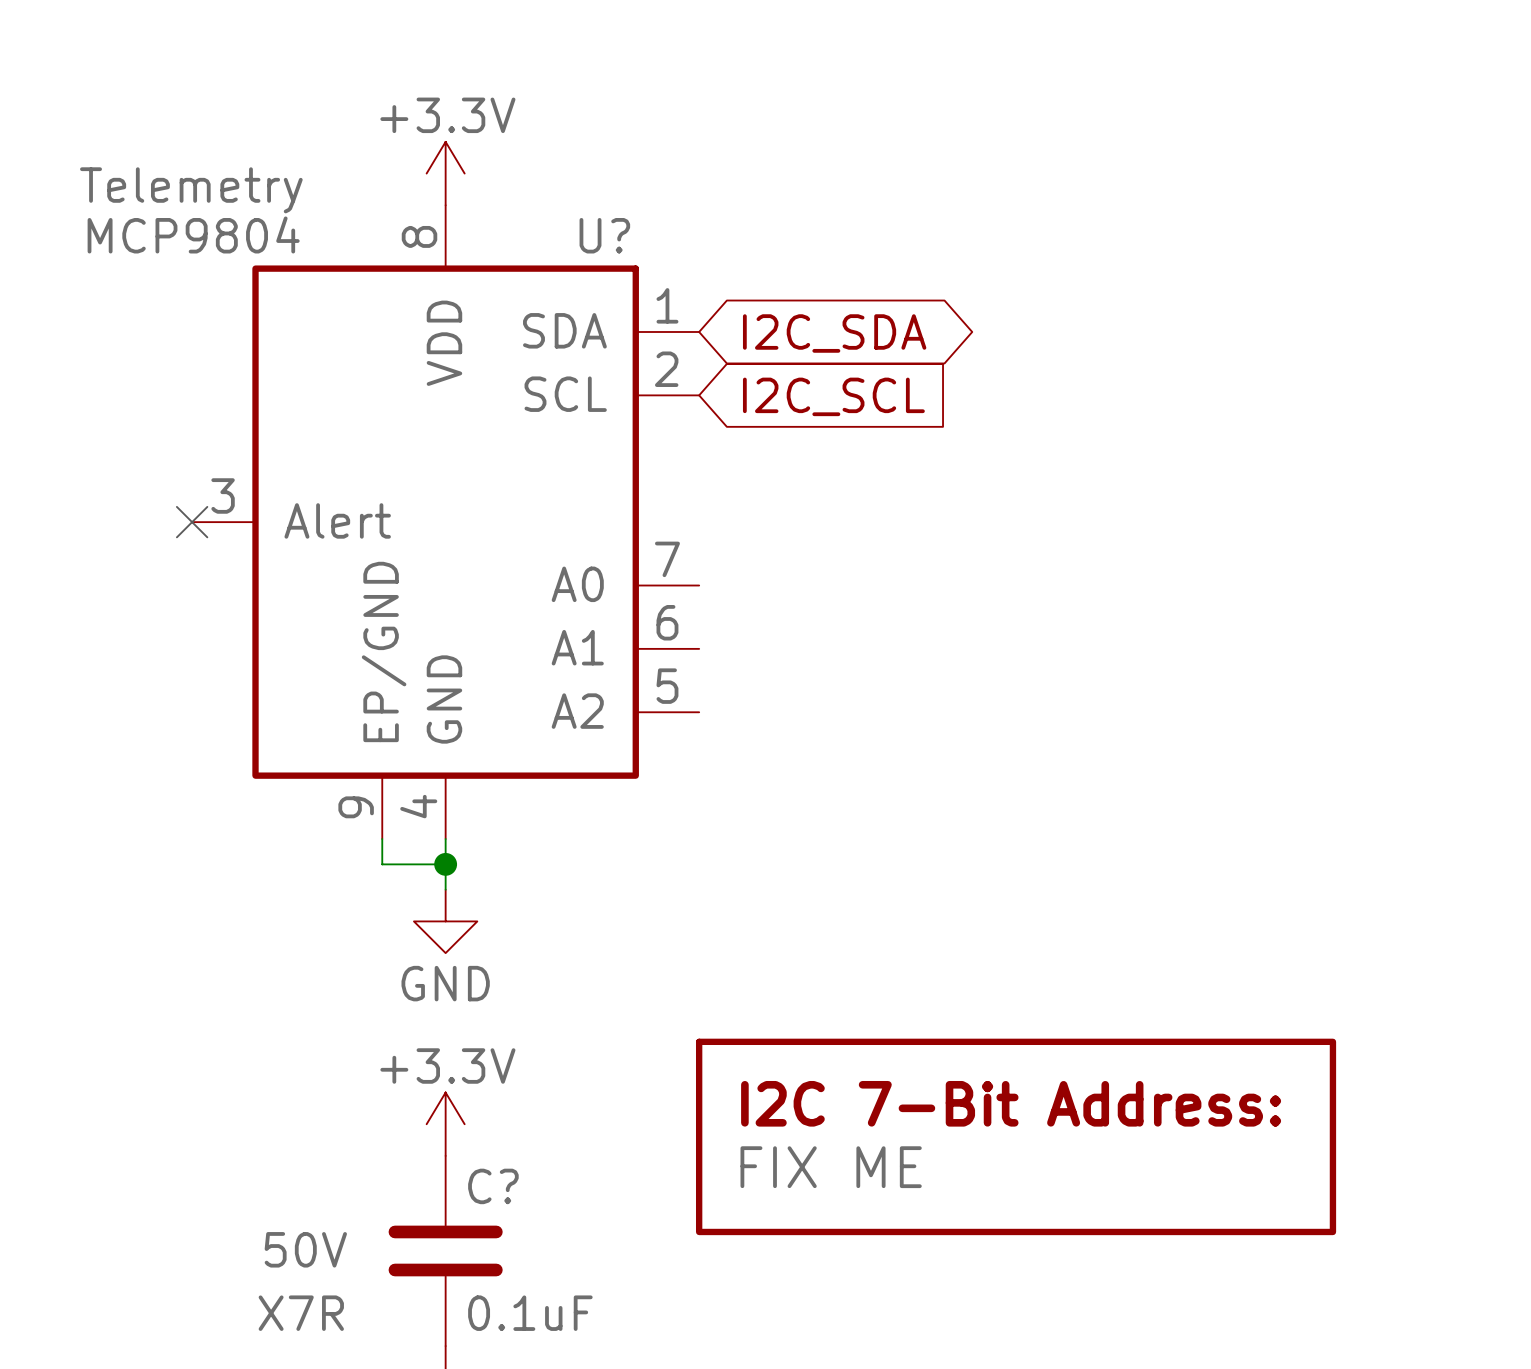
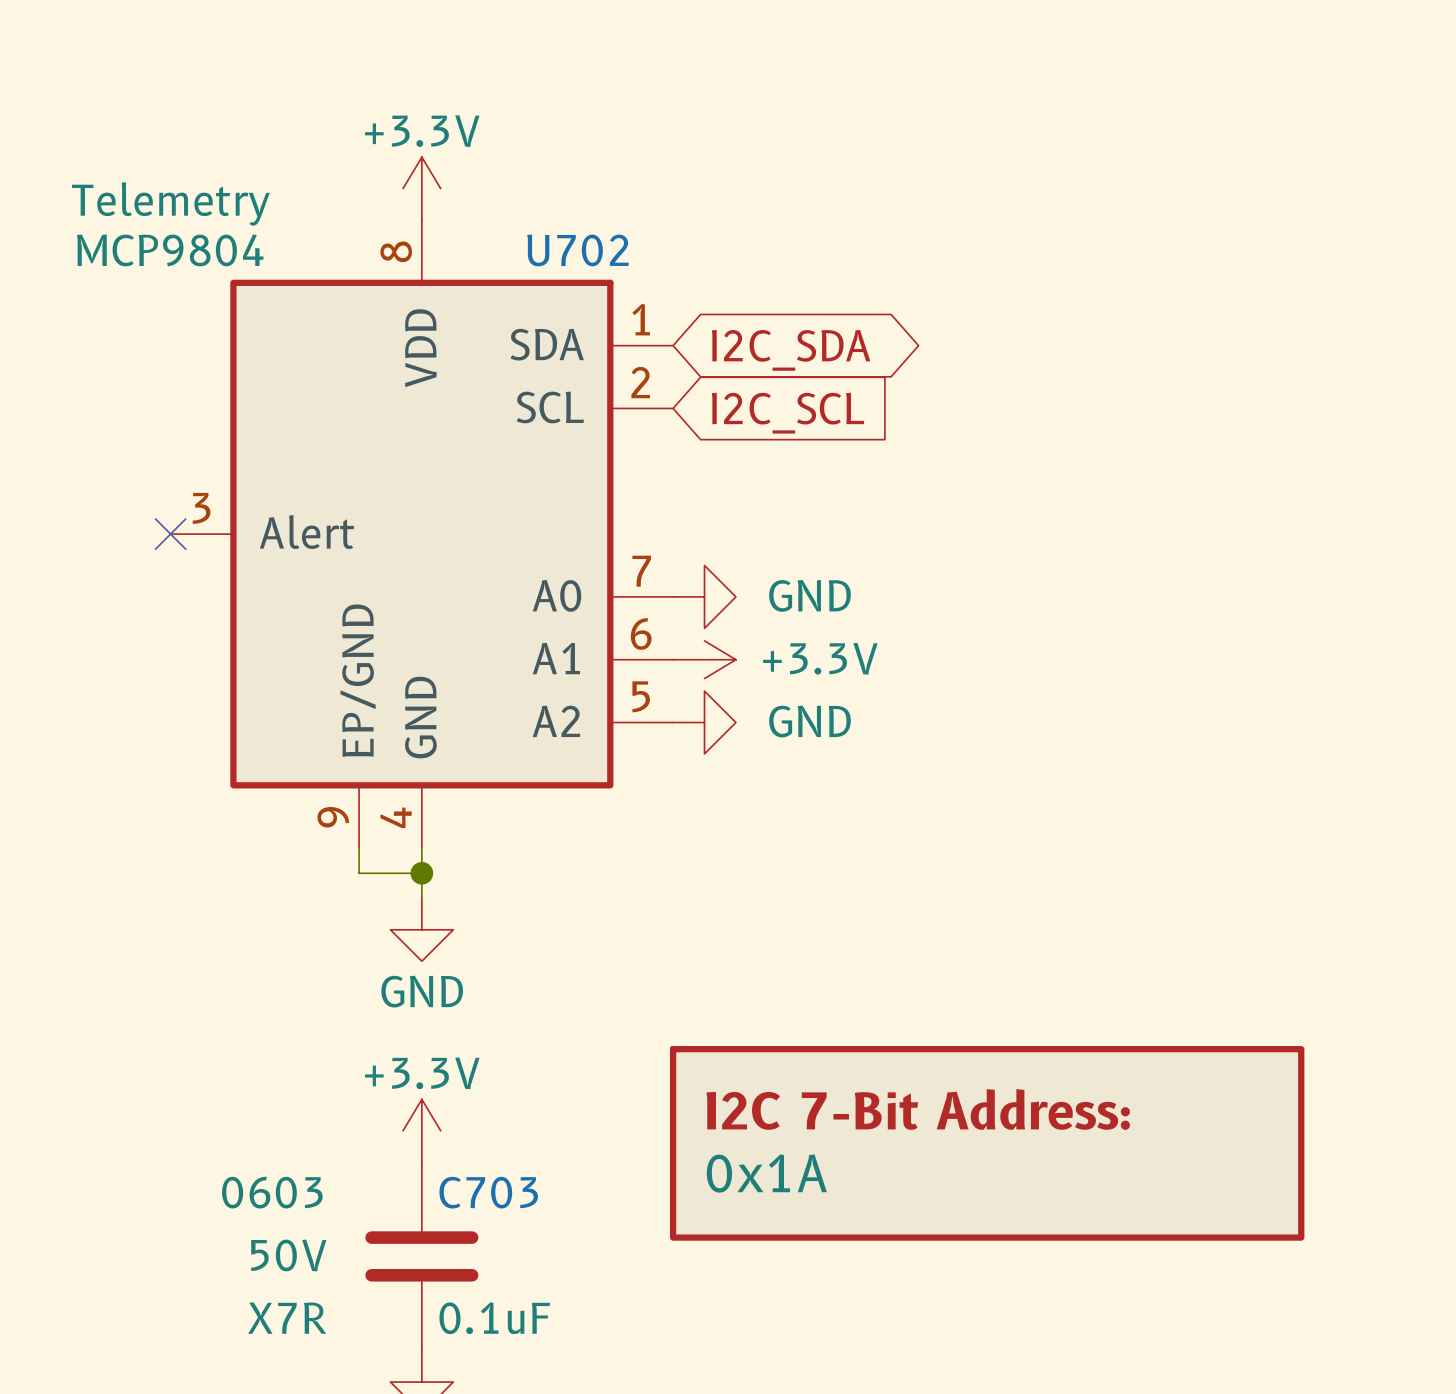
U? name: U? (604, 235) -> U702 (577, 250)
power symbol: none -> GND (704, 596)
power symbol: none -> +3.3V (704, 659)
power symbol: none -> GND (704, 722)
part value: FIX ME (831, 1167) -> 0x1A (766, 1173)
C? text: none -> 0603 (272, 1192)
C? name: C? (493, 1186) -> C703 (488, 1192)

